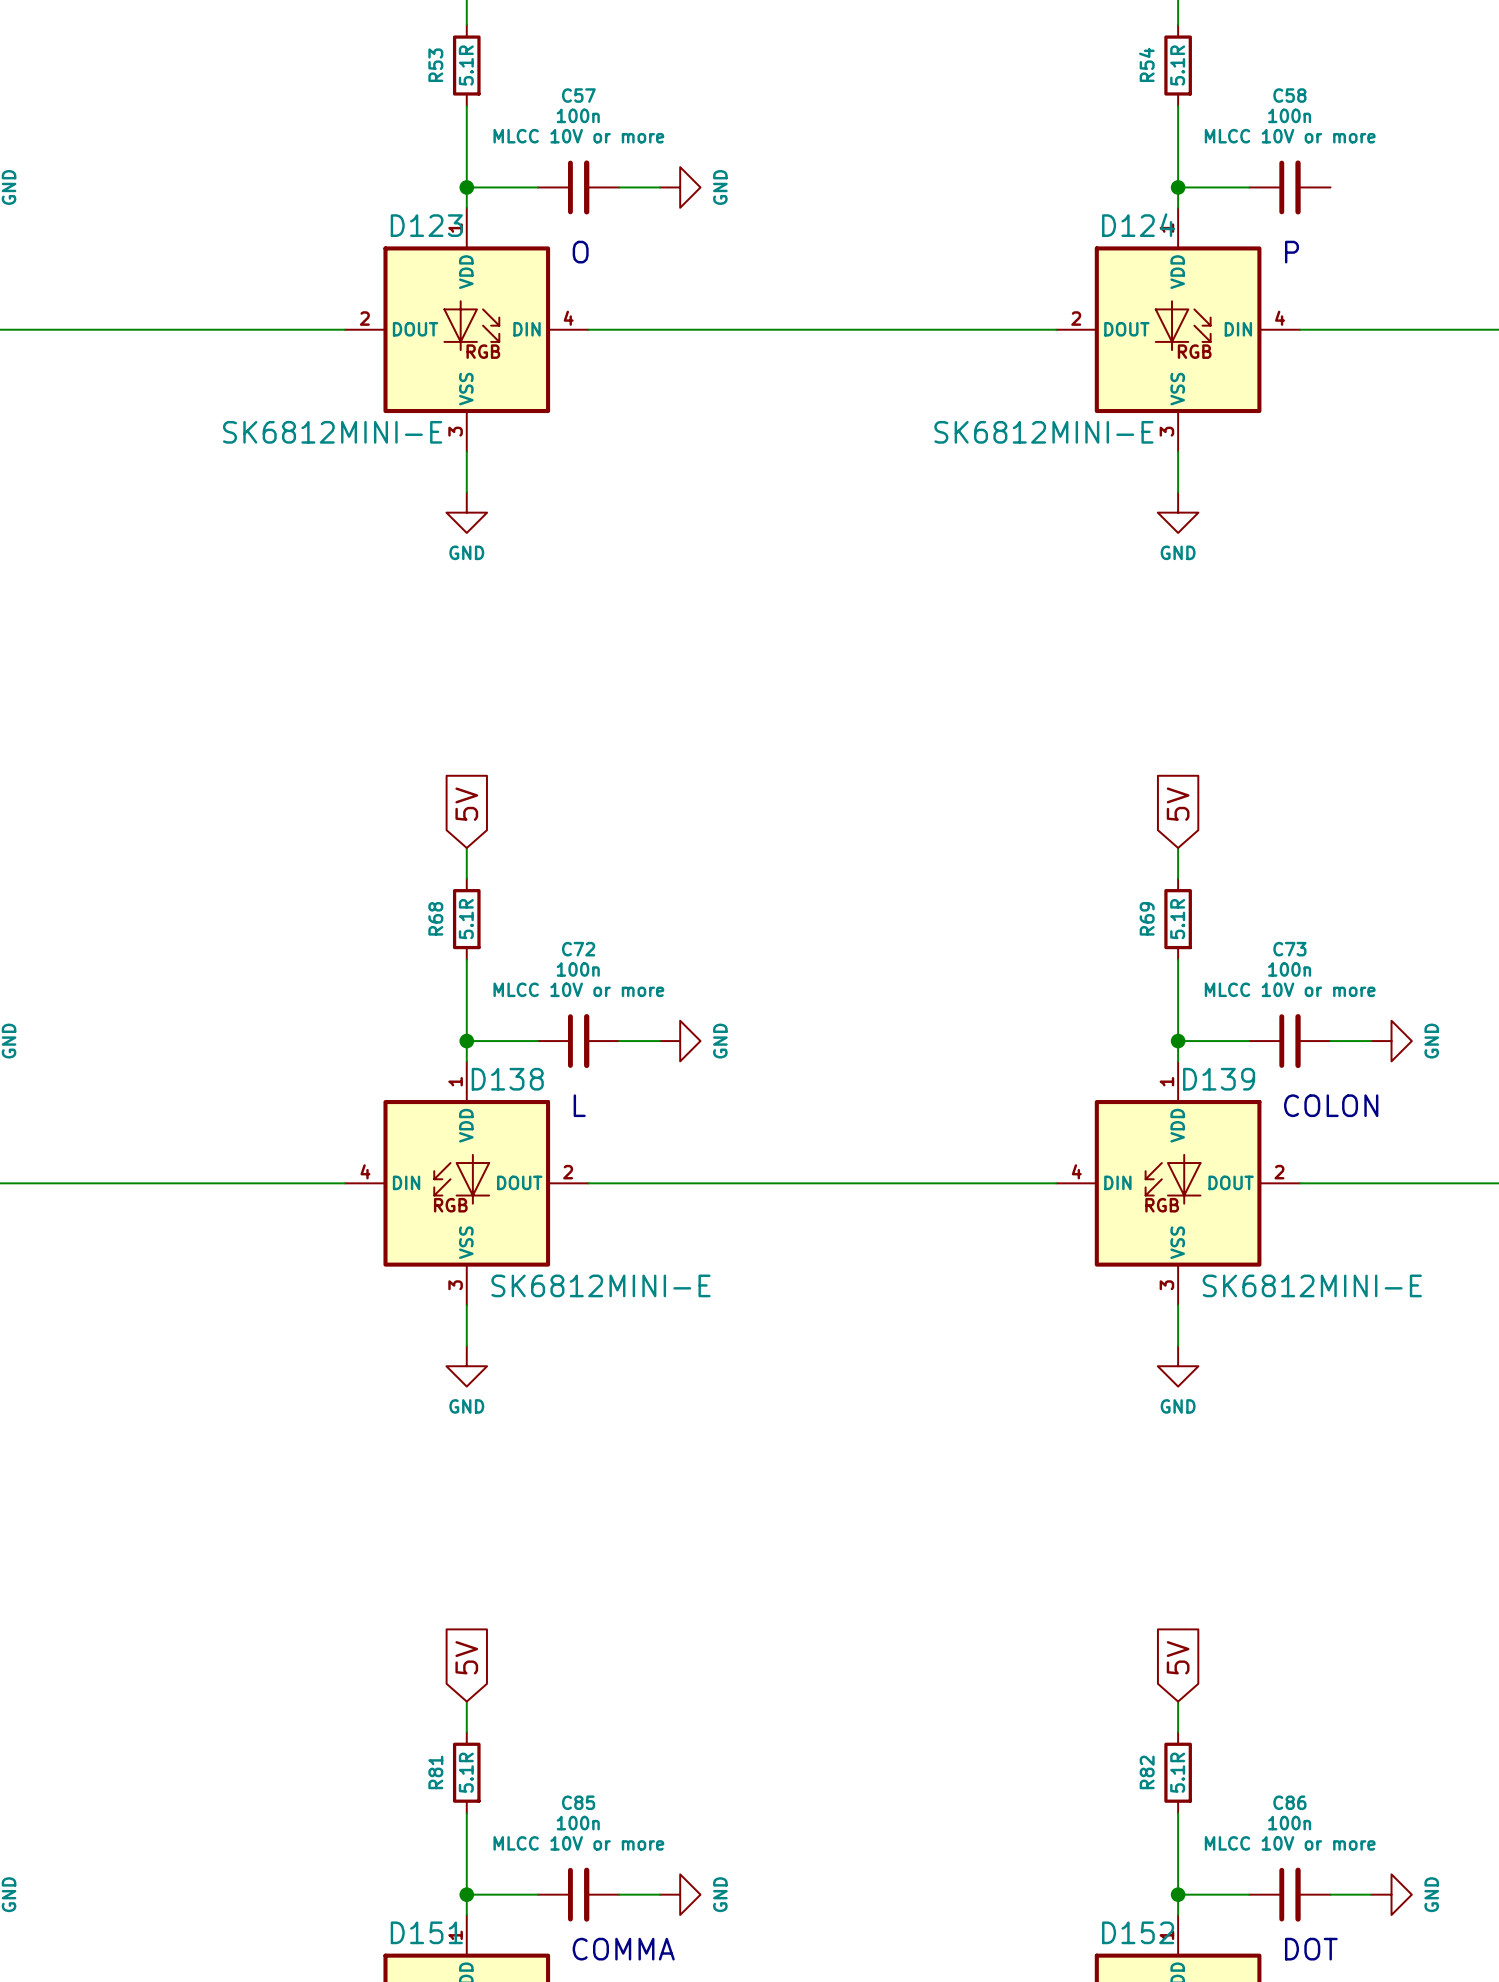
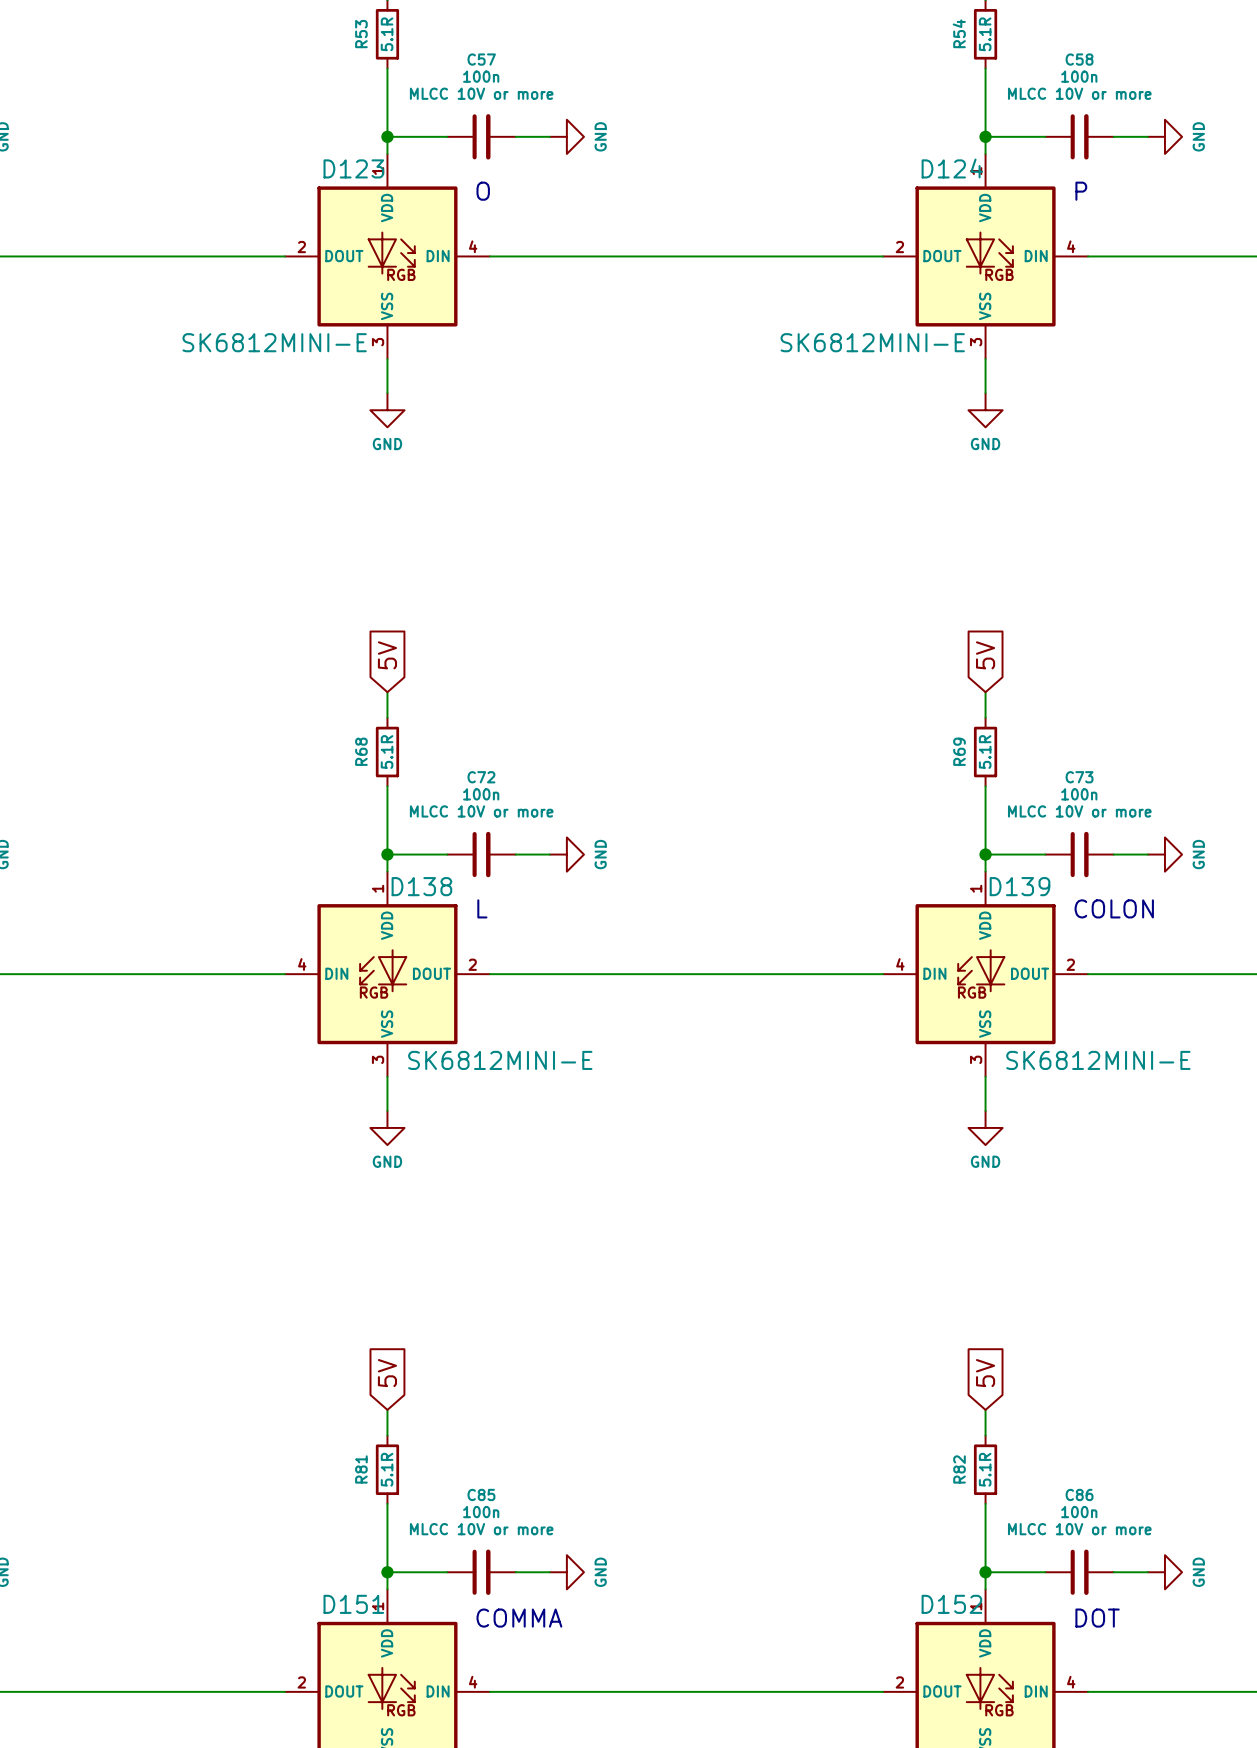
wire: none -> (1113, 136) (1147, 136)
power symbol: none -> GND (1164, 136)

